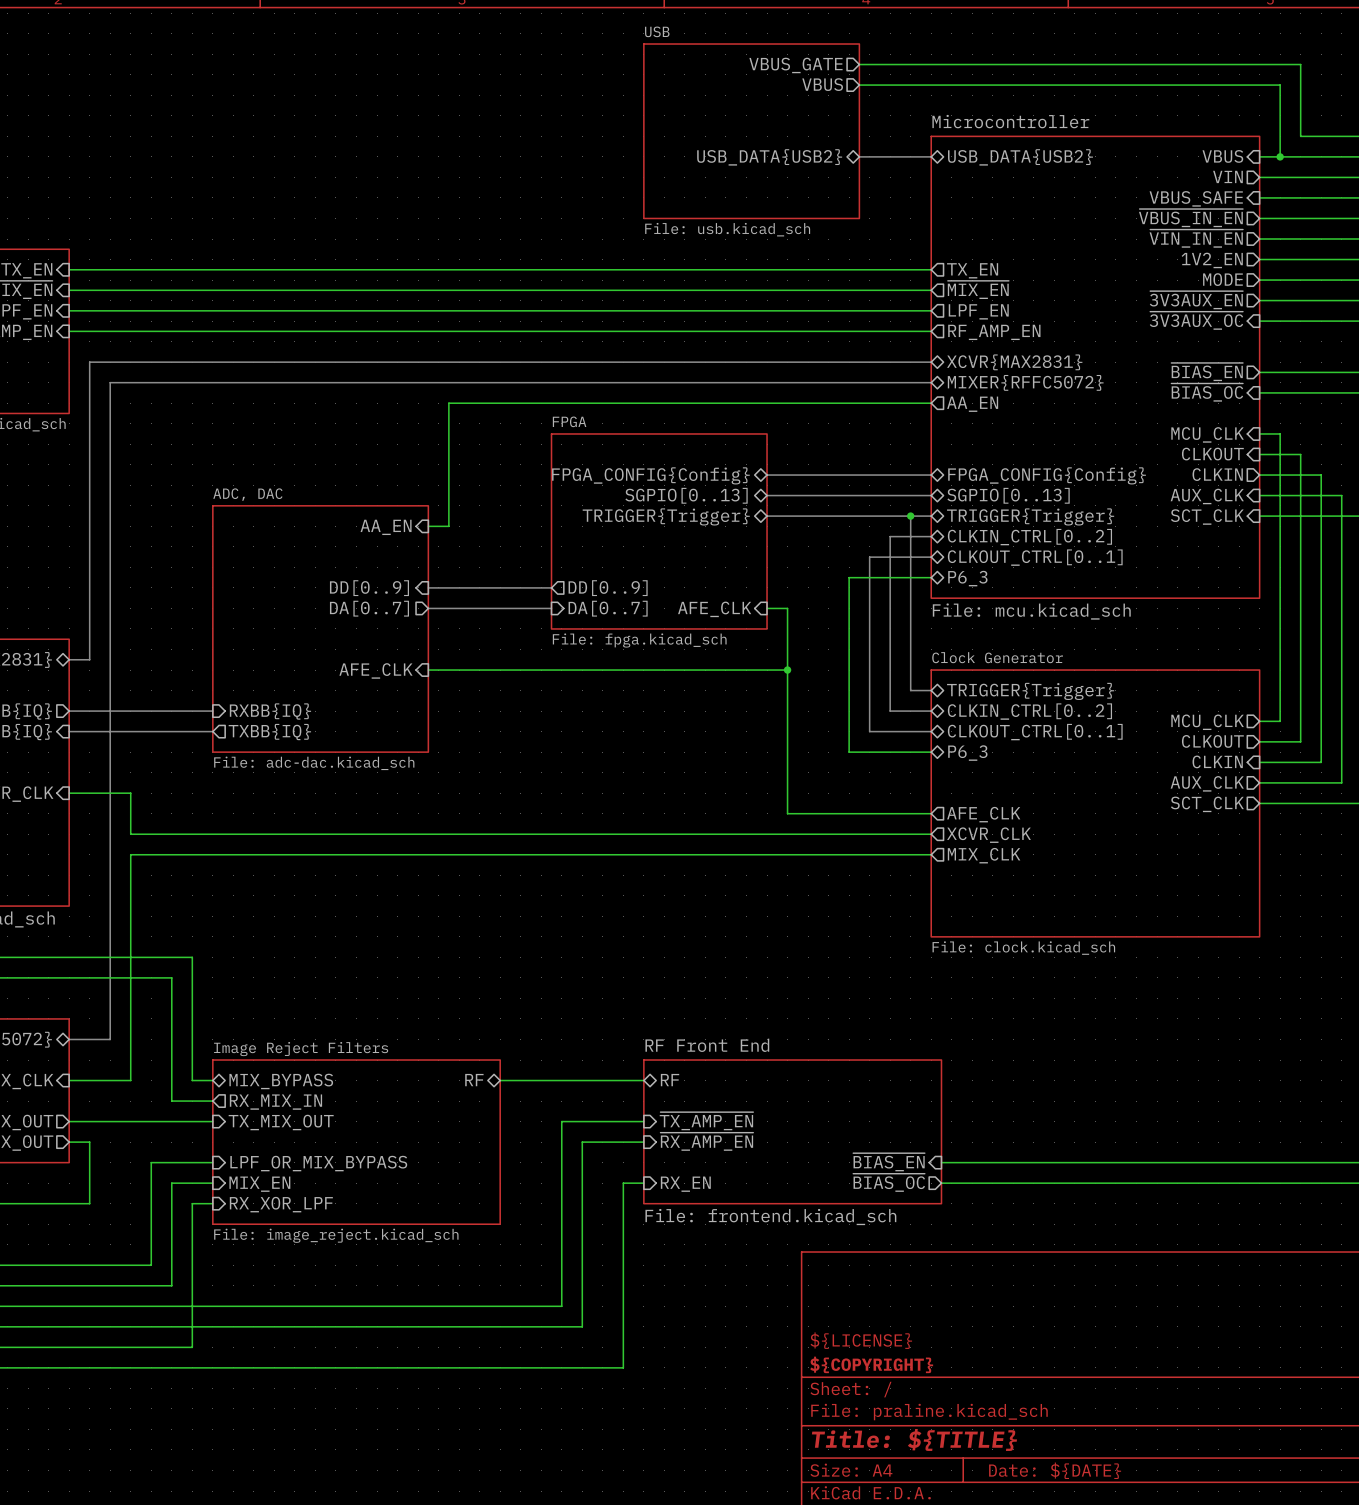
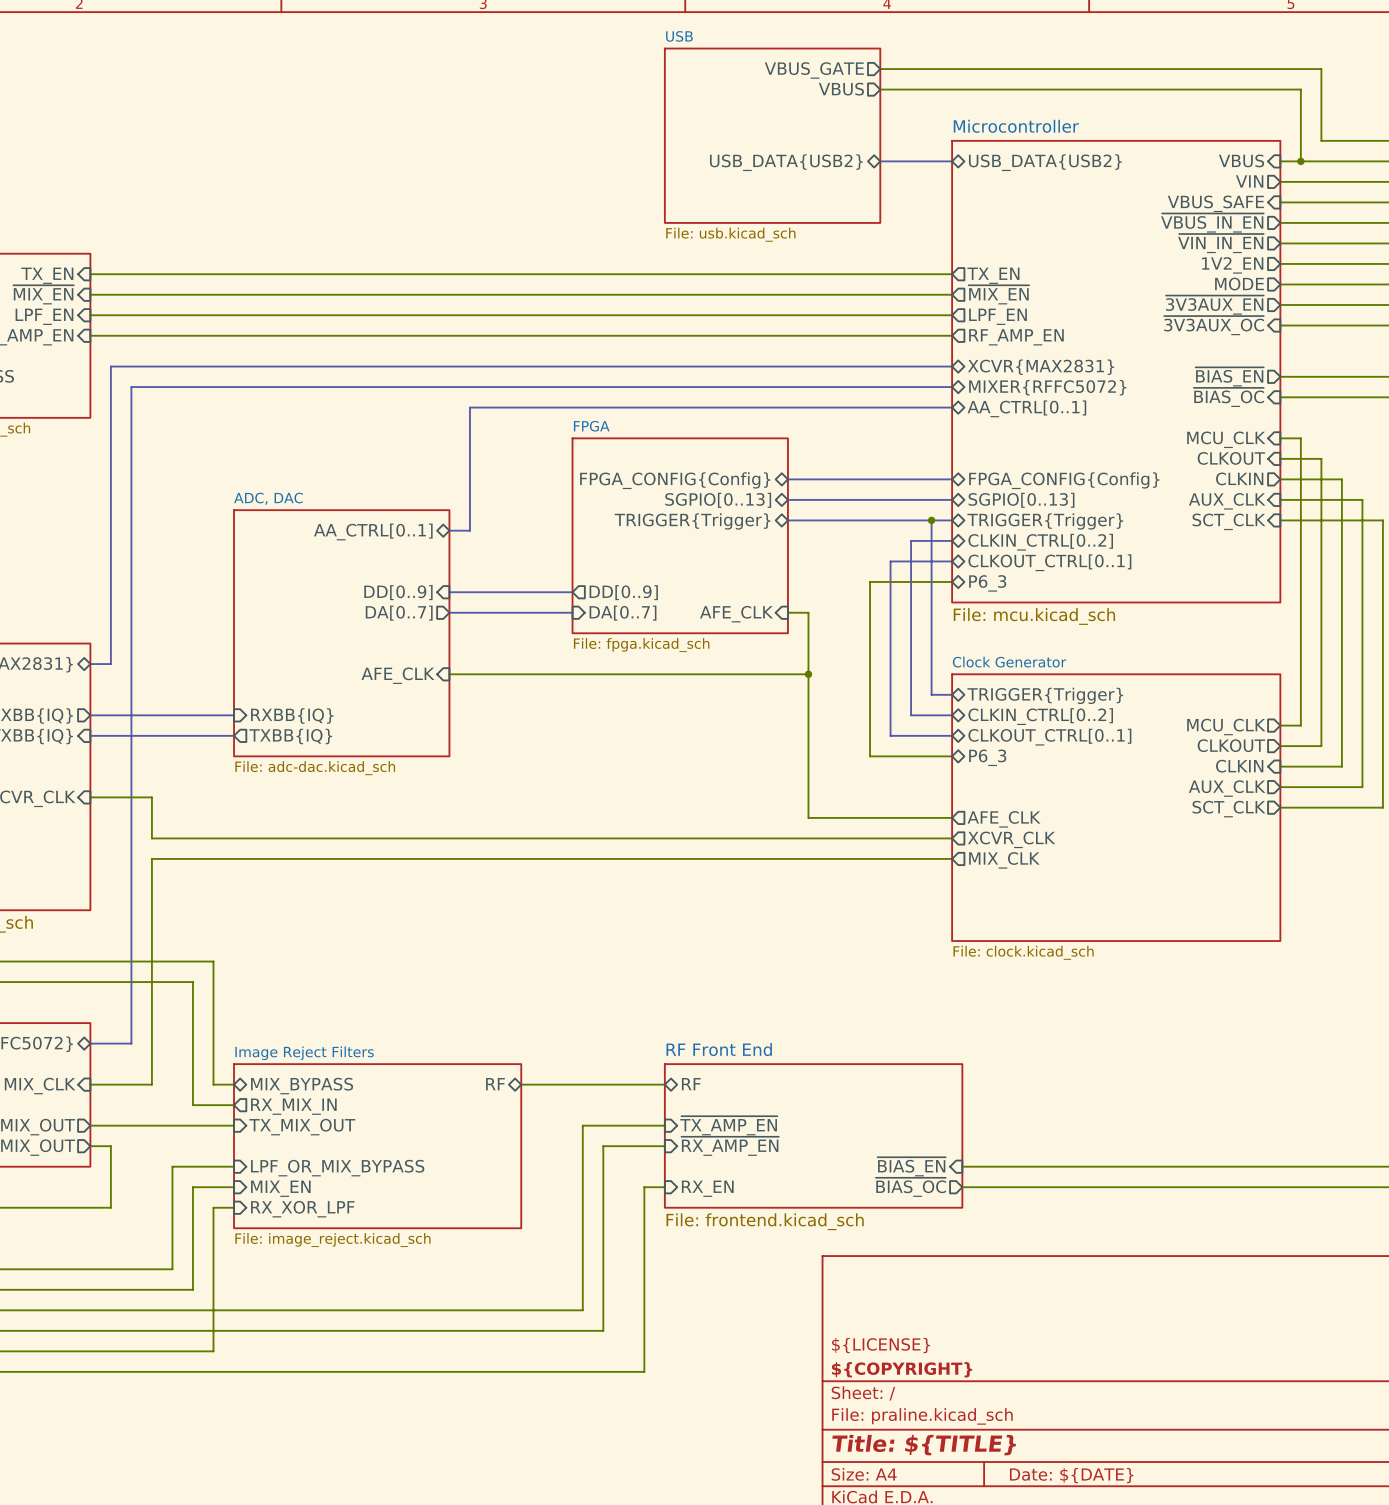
bus: none -> (952, 407) (469, 407) (469, 530) (449, 530)
sheet pin shape: output (972, 404) -> bidirectional (1026, 408)
sheet pin: AA_EN (972, 404) -> AA_CTRL[0..1] (1026, 408)
sheet pin shape: input (386, 527) -> bidirectional (373, 531)
sheet pin: AA_EN (386, 527) -> AA_CTRL[0..1] (373, 531)

